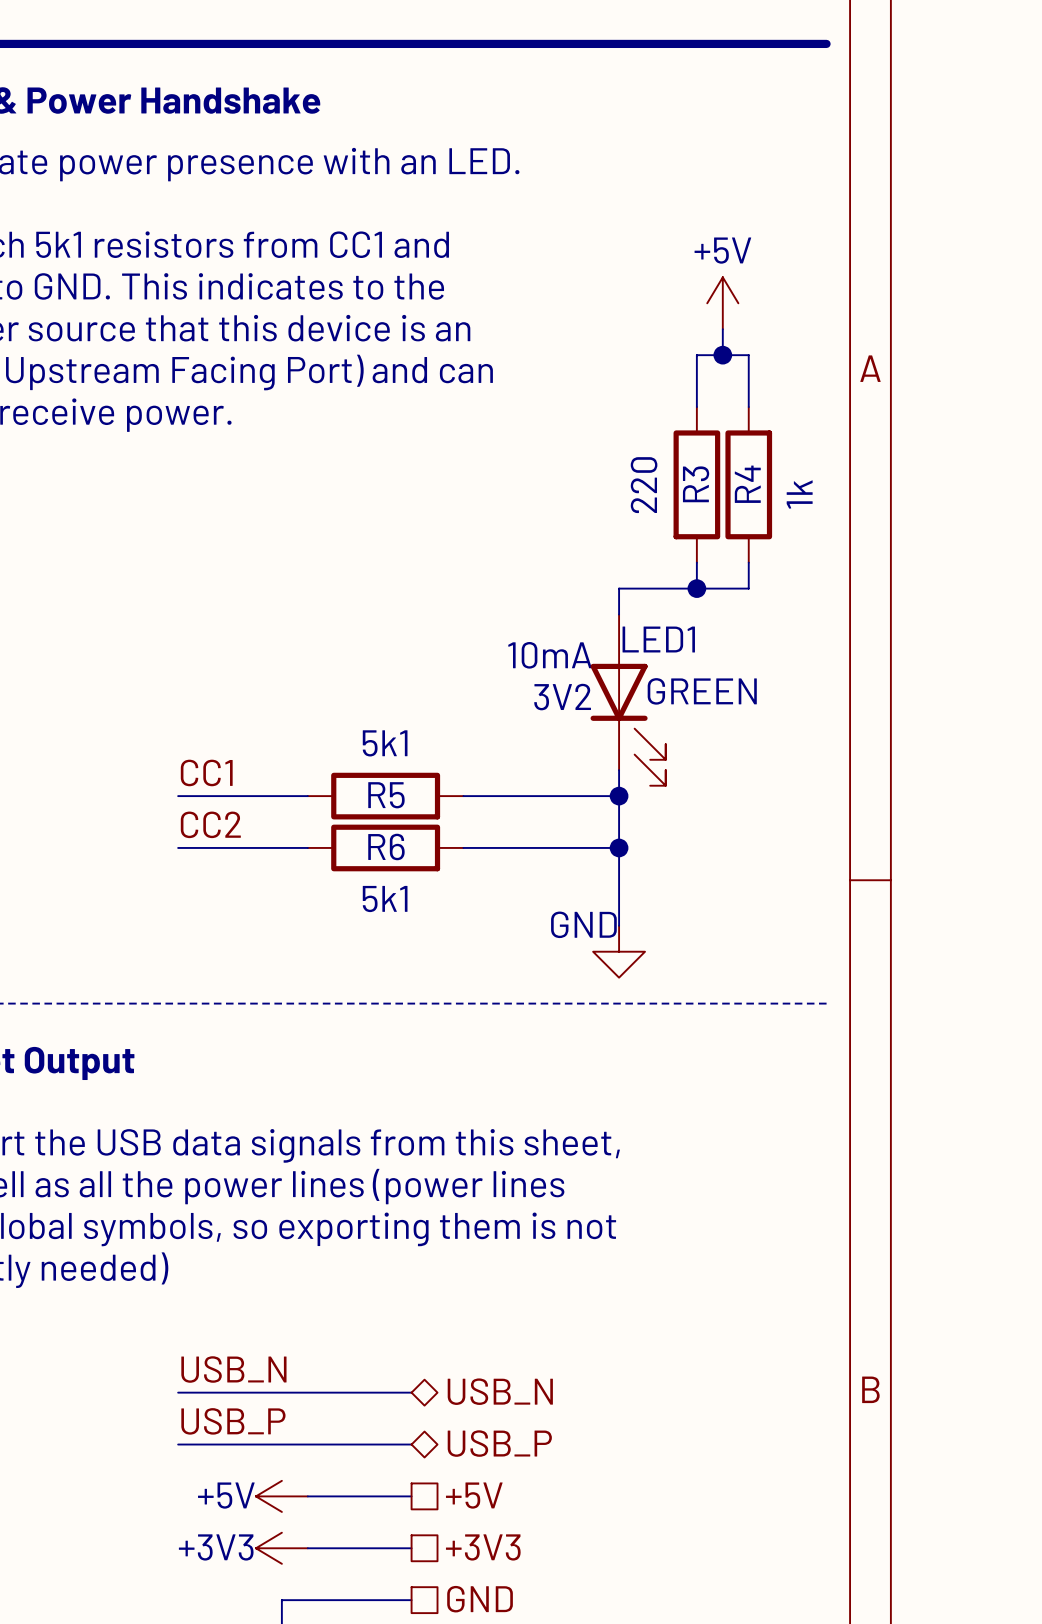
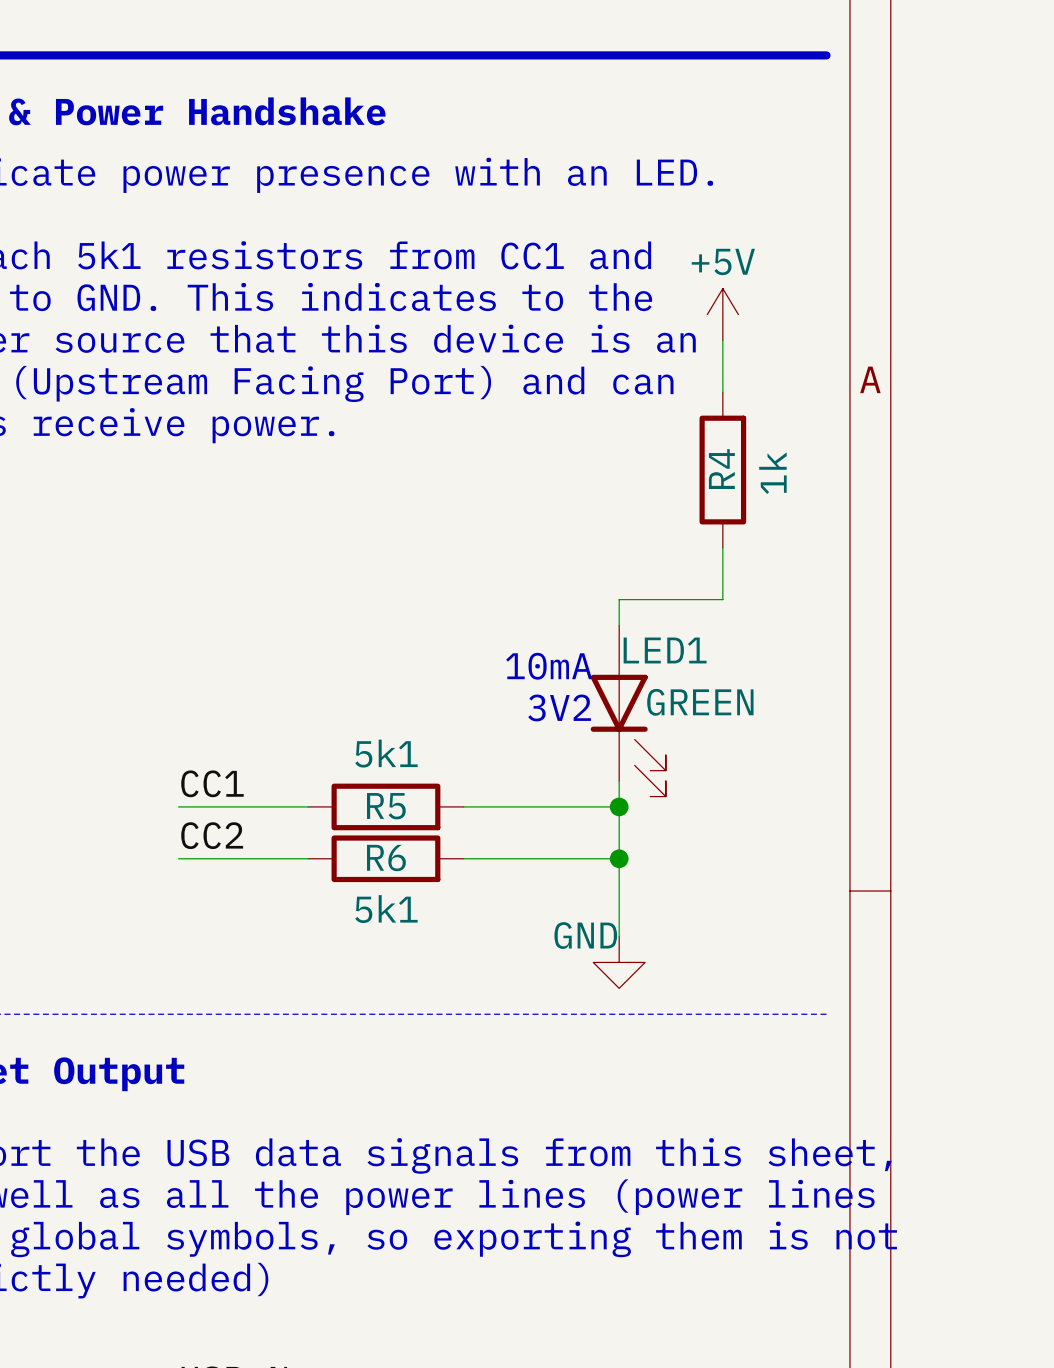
junction: (722, 355) -> none
wire: (696, 407) (696, 355) (748, 355) (748, 407) -> none
R3: 220 (696, 484) -> none
R4 position: (748, 484) -> (722, 470)
wire: (696, 562) (696, 588) -> (722, 366) (722, 392)
wire: (748, 562) (748, 588) (722, 588) -> (722, 547) (722, 599)
junction: (696, 588) -> none

